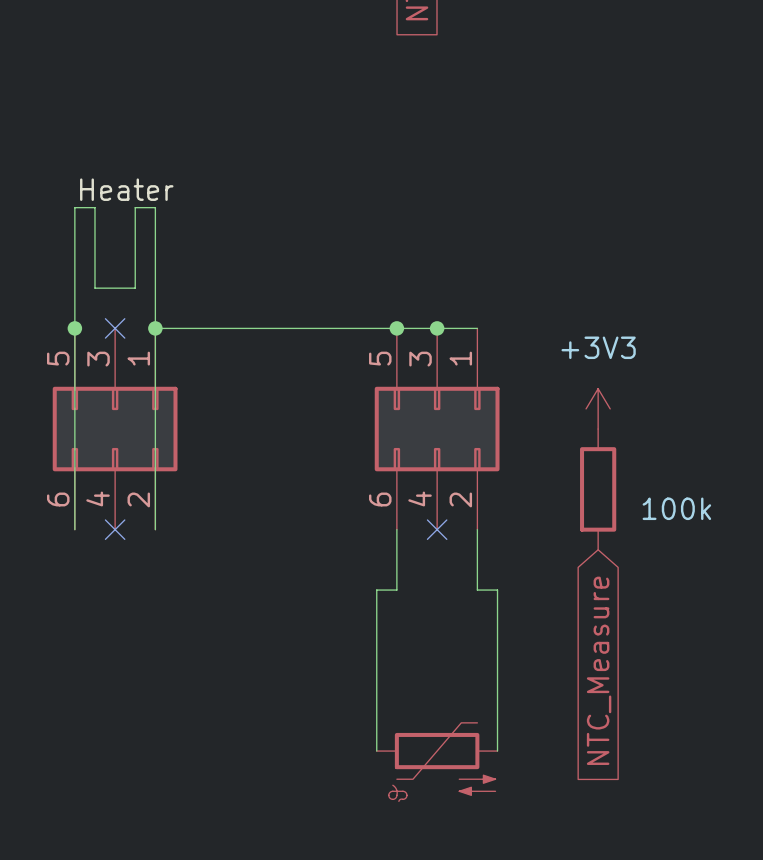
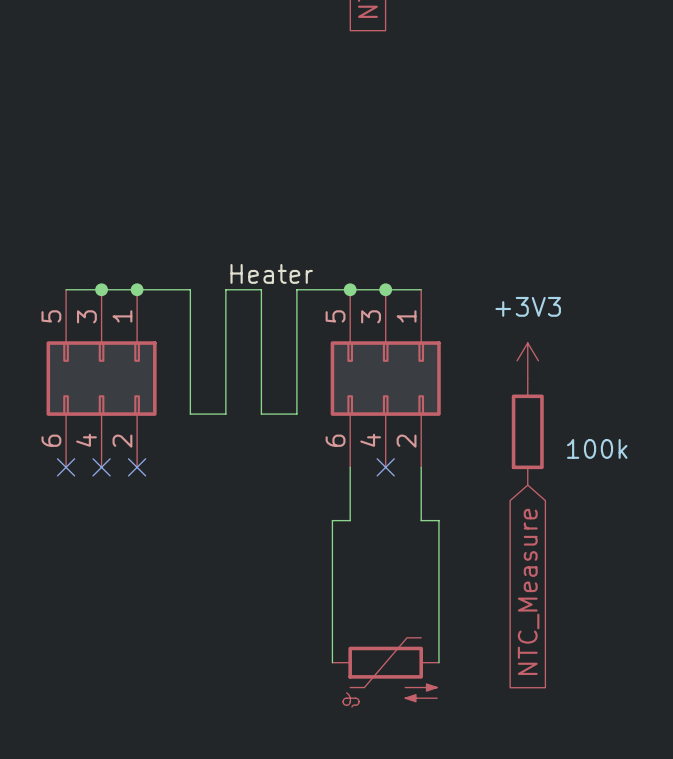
label position: Heater (126, 189) -> Heater (271, 273)
wire: none -> (66, 289) (137, 289)
junction position: (74, 328) -> (101, 289)
no-connect mark: (115, 328) -> none
wire: (215, 328) (256, 328) -> (190, 289) (190, 414) (225, 414) (225, 289)
wire: (296, 328) (336, 328) -> (261, 289) (261, 414) (296, 414) (296, 289)
wire: (74, 529) (74, 207) (94, 207) (94, 288) (135, 288) (135, 207) (155, 207) (155, 529) -> none
no-connect mark: none -> (66, 467)
no-connect mark: none -> (137, 467)

